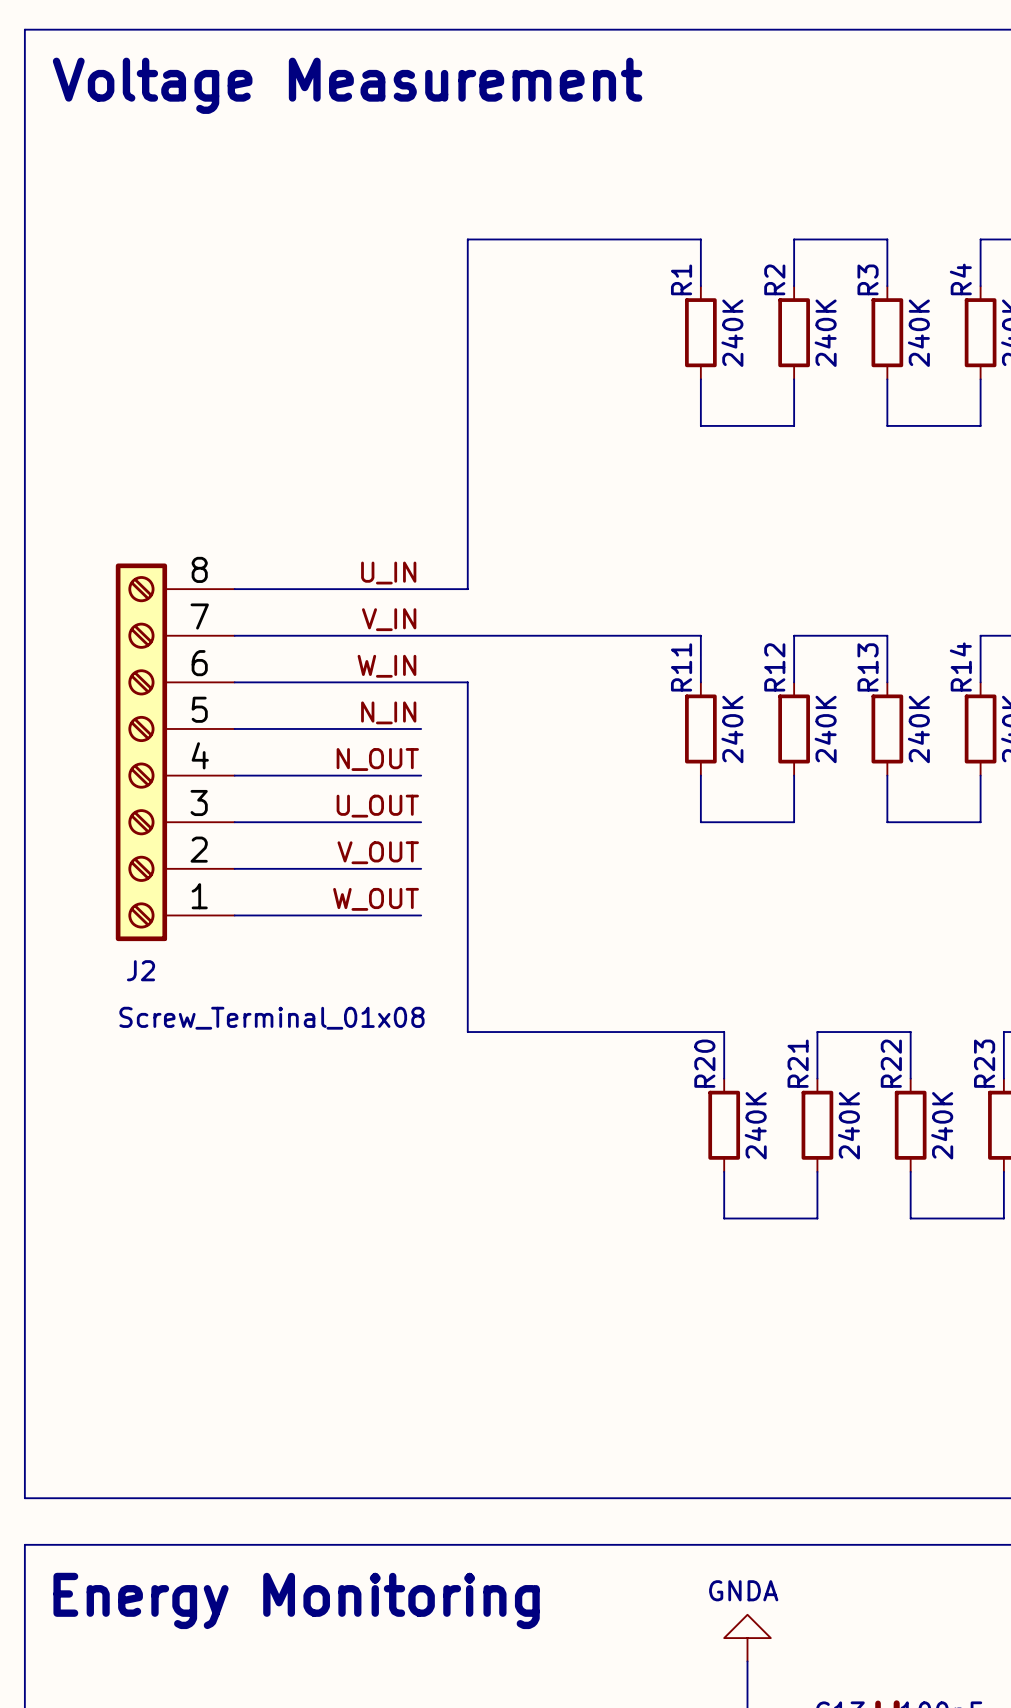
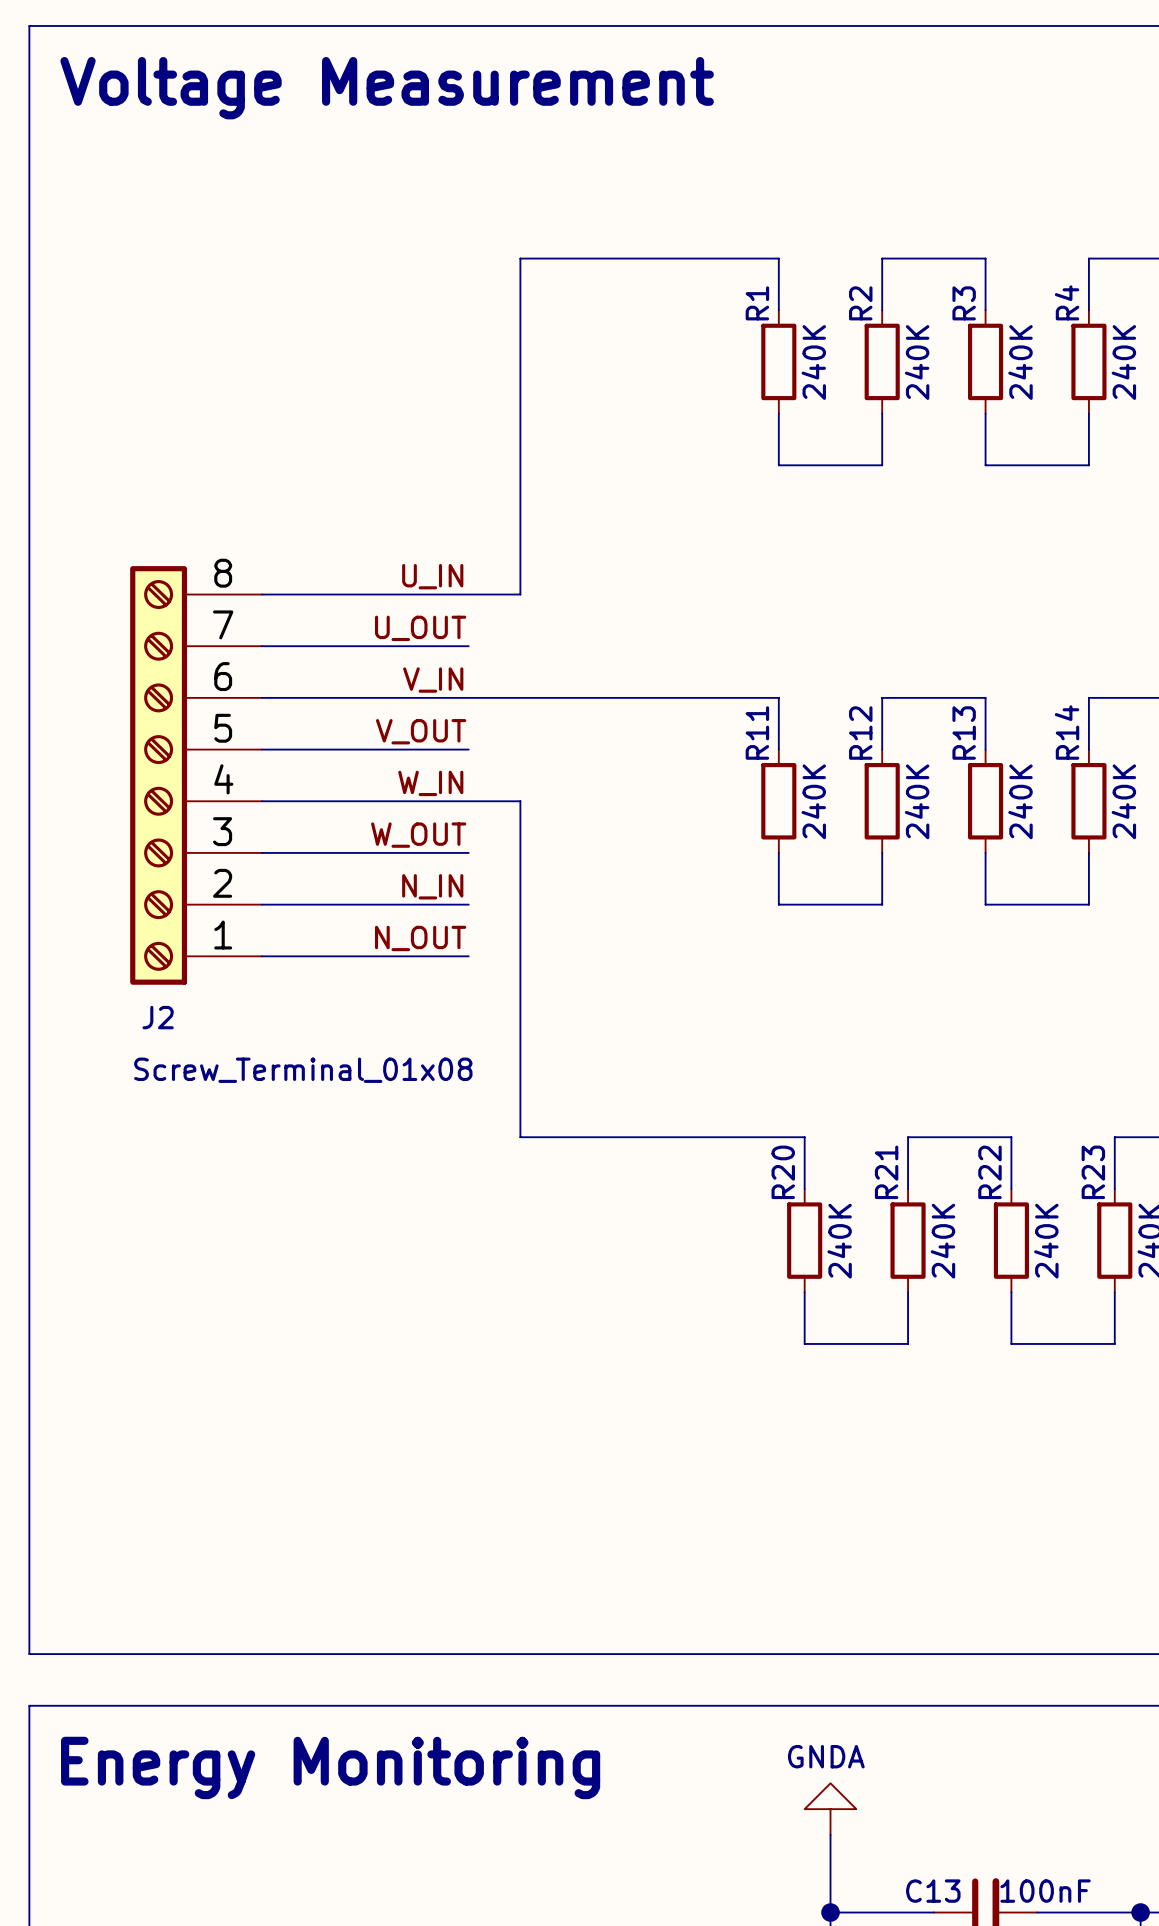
label: none -> U_IN (432, 576)
wire: (467, 542) (467, 589) (421, 589) -> (520, 594) (261, 594)
label: U_IN (388, 573) -> U_OUT (420, 628)
label: W_IN (386, 666) -> V_OUT (421, 731)
wire: (421, 682) (467, 682) (467, 728) -> (468, 801) (520, 801)
label: N_IN (388, 712) -> W_IN (430, 783)
J2 position: (175, 752) -> (196, 775)
label: N_OUT (377, 759) -> W_OUT (418, 835)
label: U_OUT (377, 806) -> N_IN (432, 886)
label: V_OUT (378, 852) -> N_OUT (420, 938)
label: W_OUT (376, 899) -> none
wire: (234, 915) (421, 915) -> none

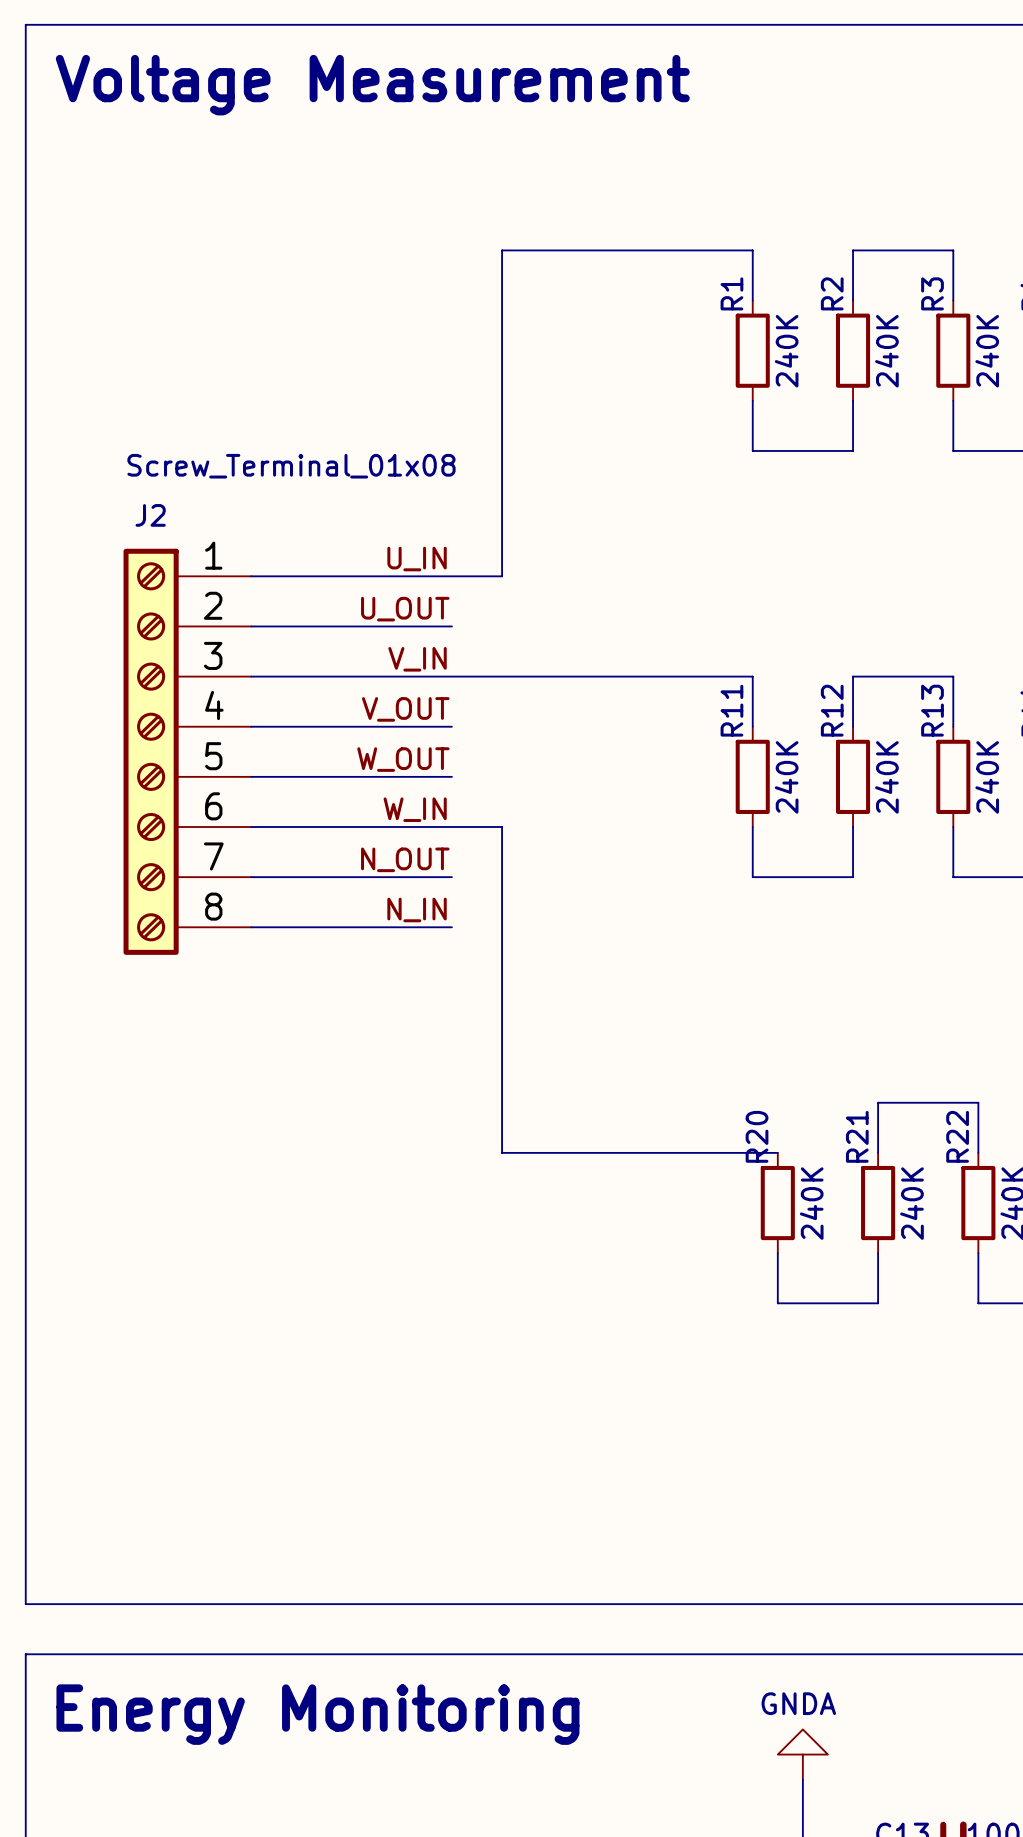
J2 flip: as is (158, 775) -> up-down (151, 751)
label: W_IN (430, 783) -> W_OUT (403, 759)
wire: (468, 801) (520, 801) (520, 852) -> (451, 827) (502, 827)
label: W_OUT (418, 835) -> W_IN (415, 809)
label: N_IN (432, 886) -> N_OUT (405, 859)
label: N_OUT (420, 938) -> N_IN (417, 909)
wire: (520, 1137) (804, 1137) (804, 1188) -> (502, 1102) (502, 1152) (777, 1152)

